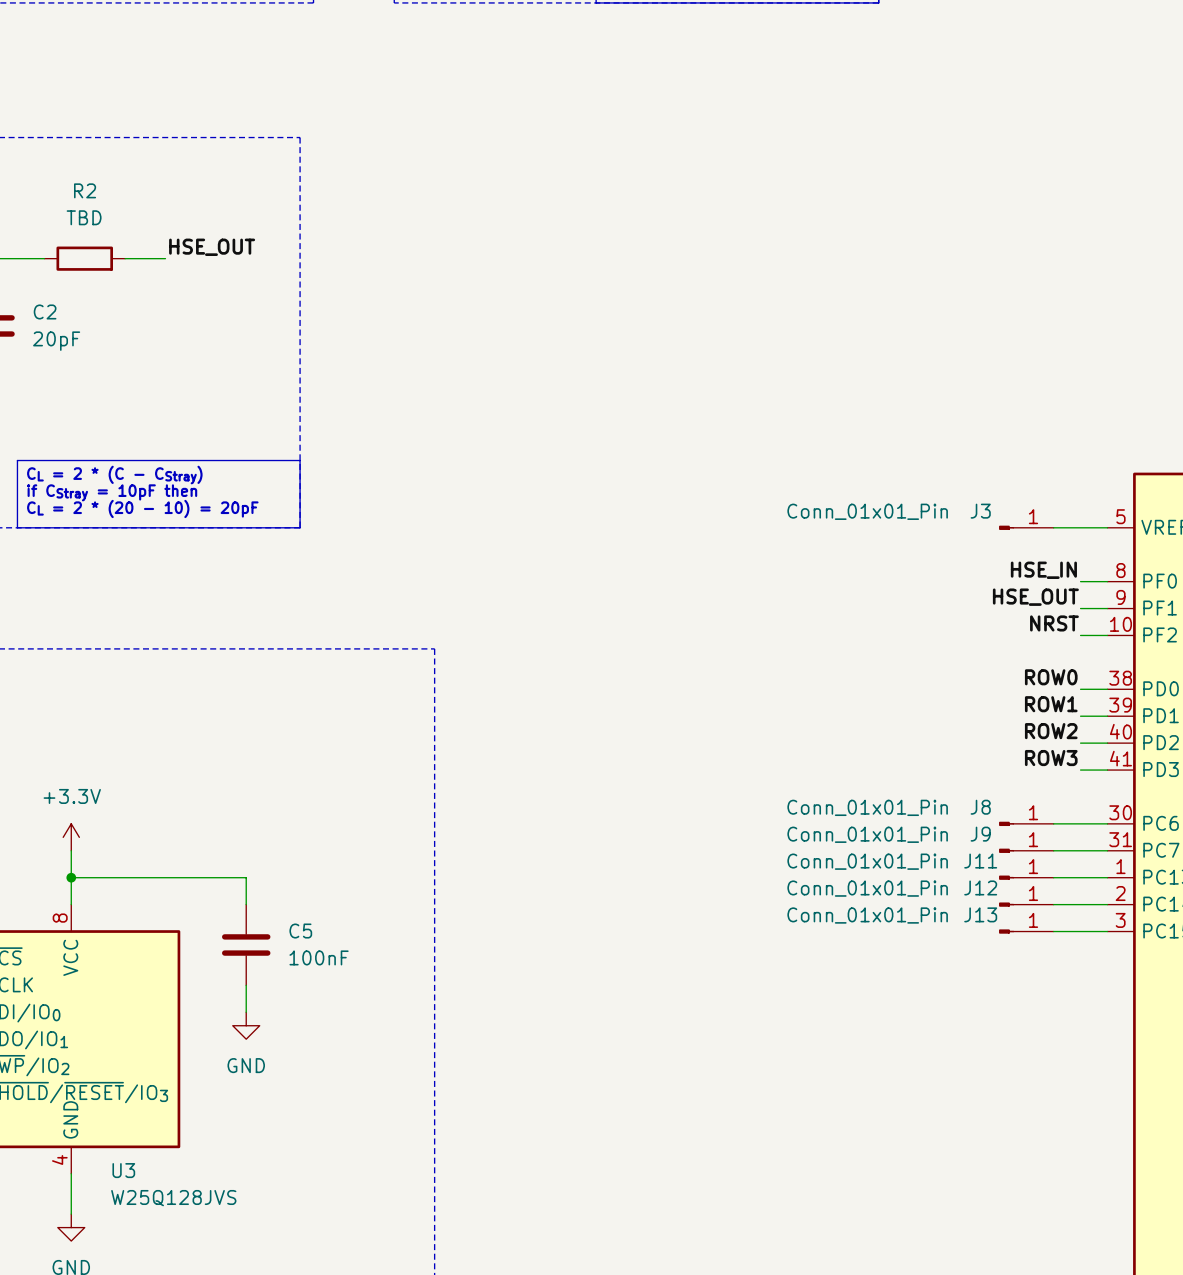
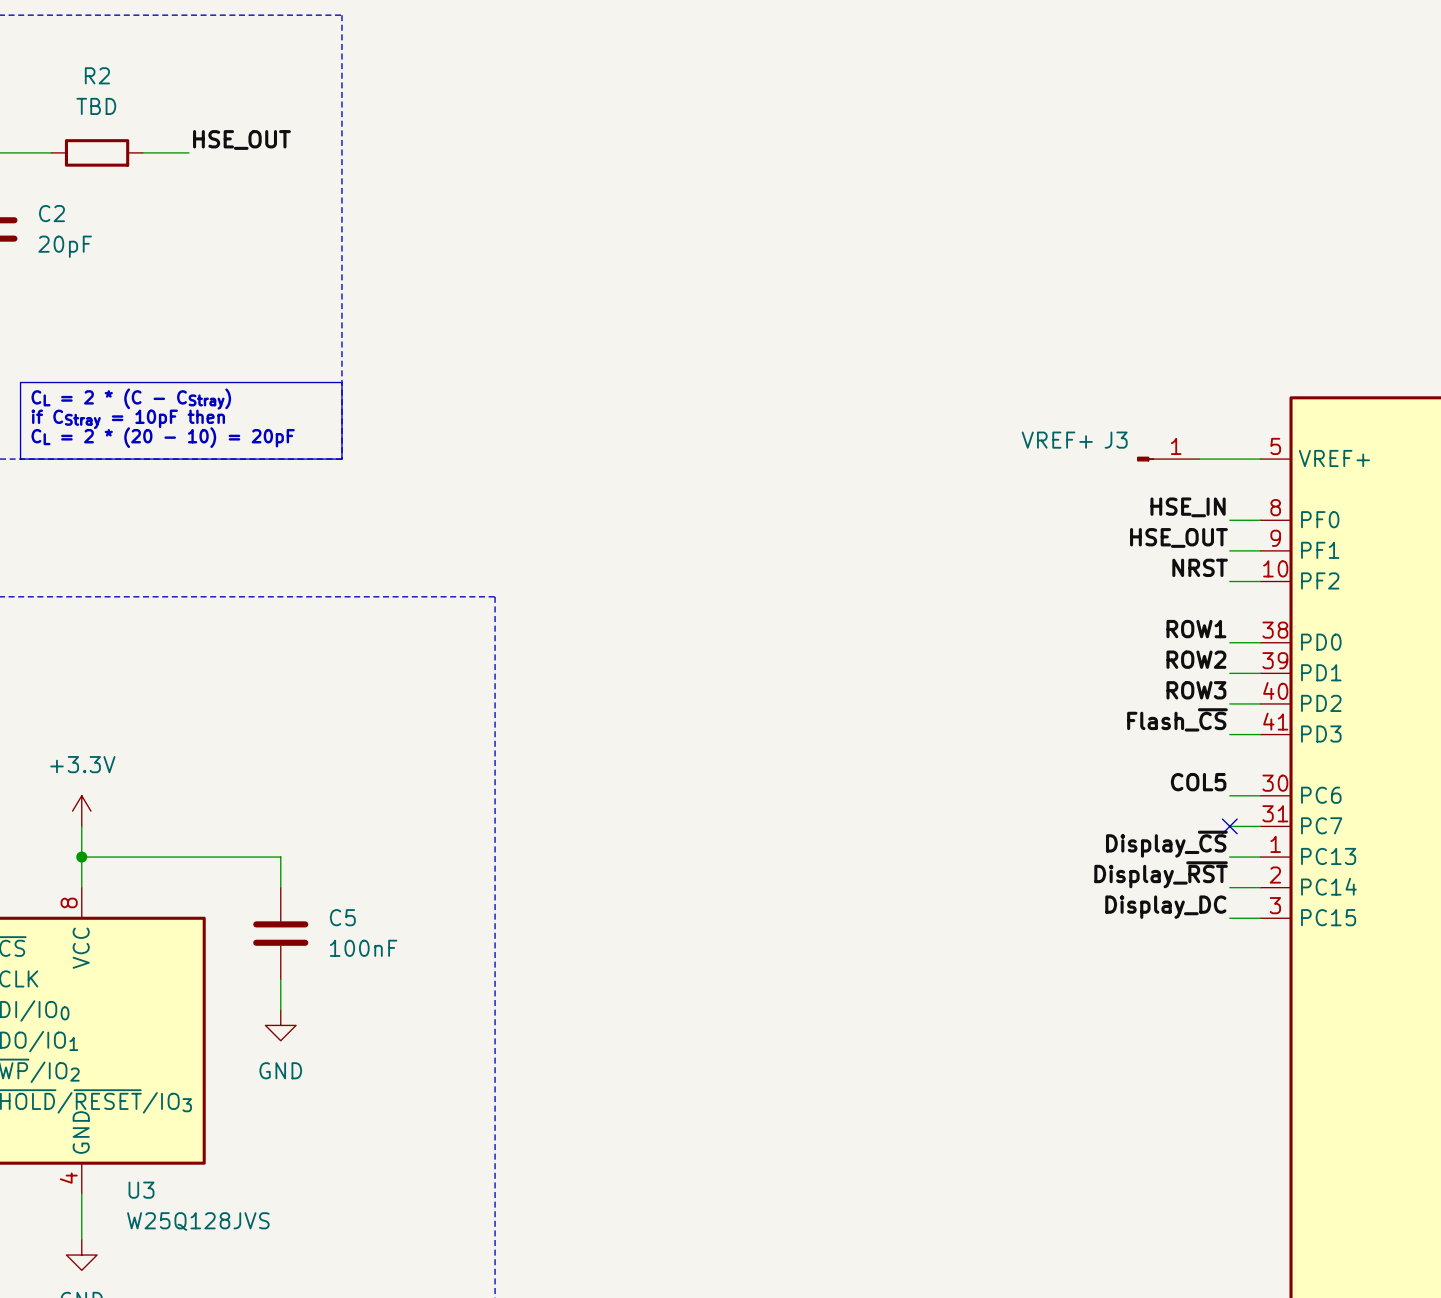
J3 value: Conn_01x01_Pin (867, 511) -> VREF+ (1057, 440)
label: ROW0 (1051, 677) -> ROW1 (1196, 629)
label: ROW1 (1051, 704) -> ROW2 (1196, 659)
label: ROW2 (1051, 731) -> ROW3 (1196, 690)
label: ROW3 (1051, 758) -> Flash_~{CS} (1177, 719)
label: none -> COL5 (1198, 782)
J8: Conn_01x01_Pin (1026, 823) -> none
wire: (1053, 823) (1080, 823) -> none
J9: Conn_01x01_Pin (1026, 850) -> none
wire: (1053, 850) (1080, 850) -> none
no-connect mark: none -> (1229, 826)
label: none -> Display_~{CS} (1166, 844)
J11: Conn_01x01_Pin (1026, 877) -> none
wire: (1053, 877) (1080, 877) -> none
label: none -> Display_~{RST} (1161, 874)
J12: Conn_01x01_Pin (1026, 904) -> none
wire: (1053, 904) (1080, 904) -> none
label: none -> Display_DC (1165, 907)
J13: Conn_01x01_Pin (1026, 931) -> none
wire: (1053, 931) (1080, 931) -> none

